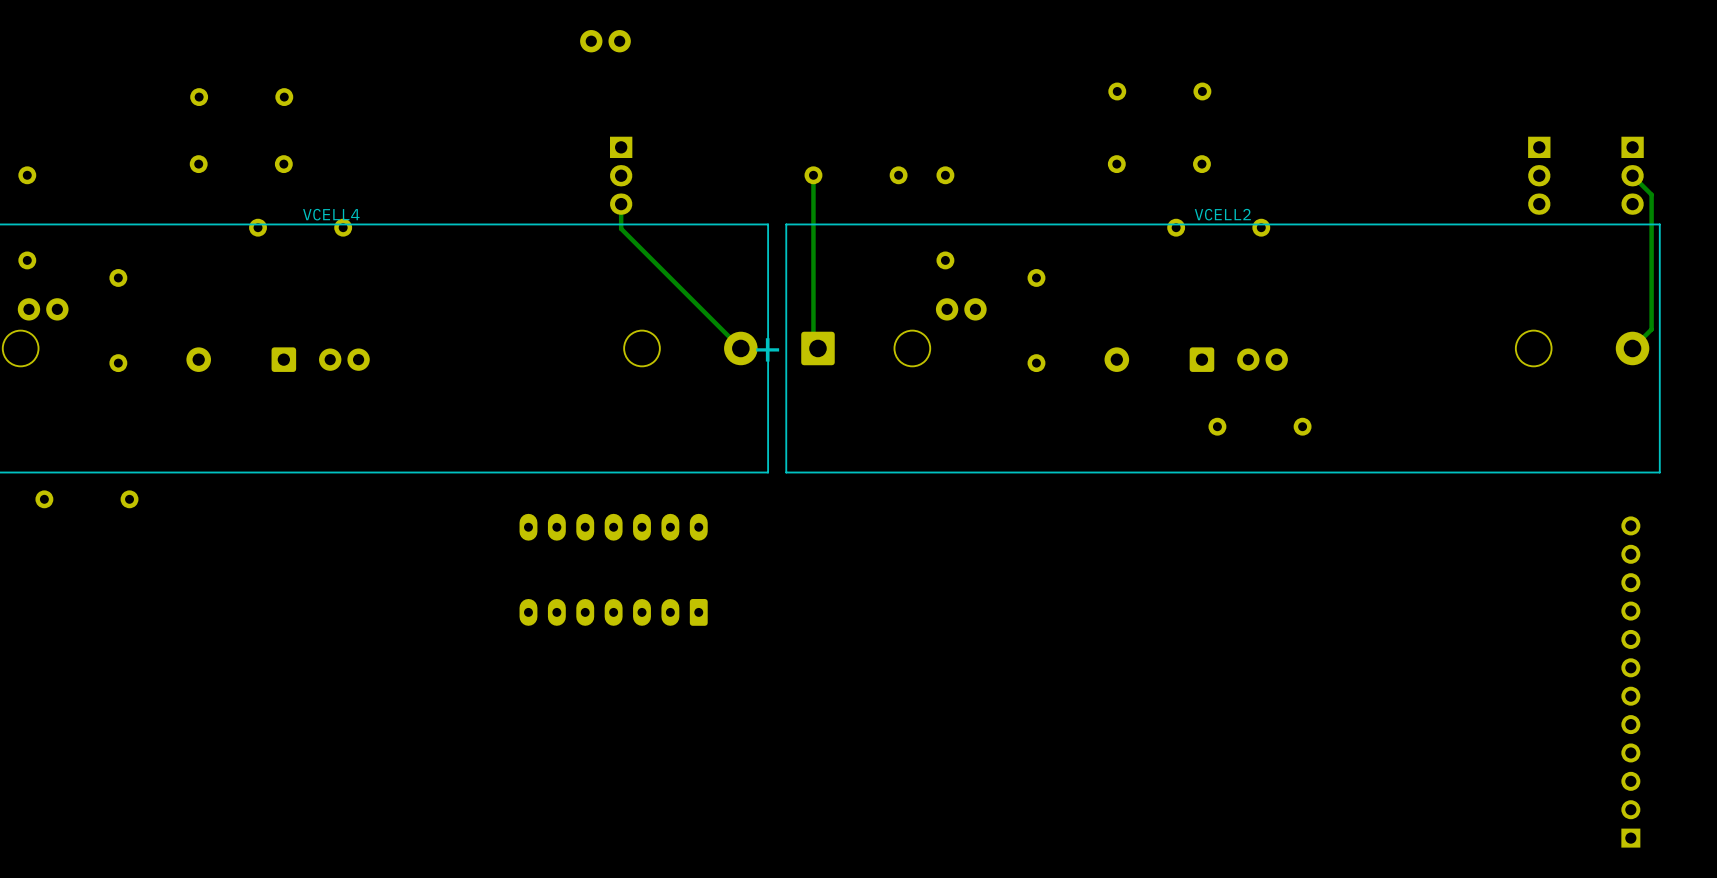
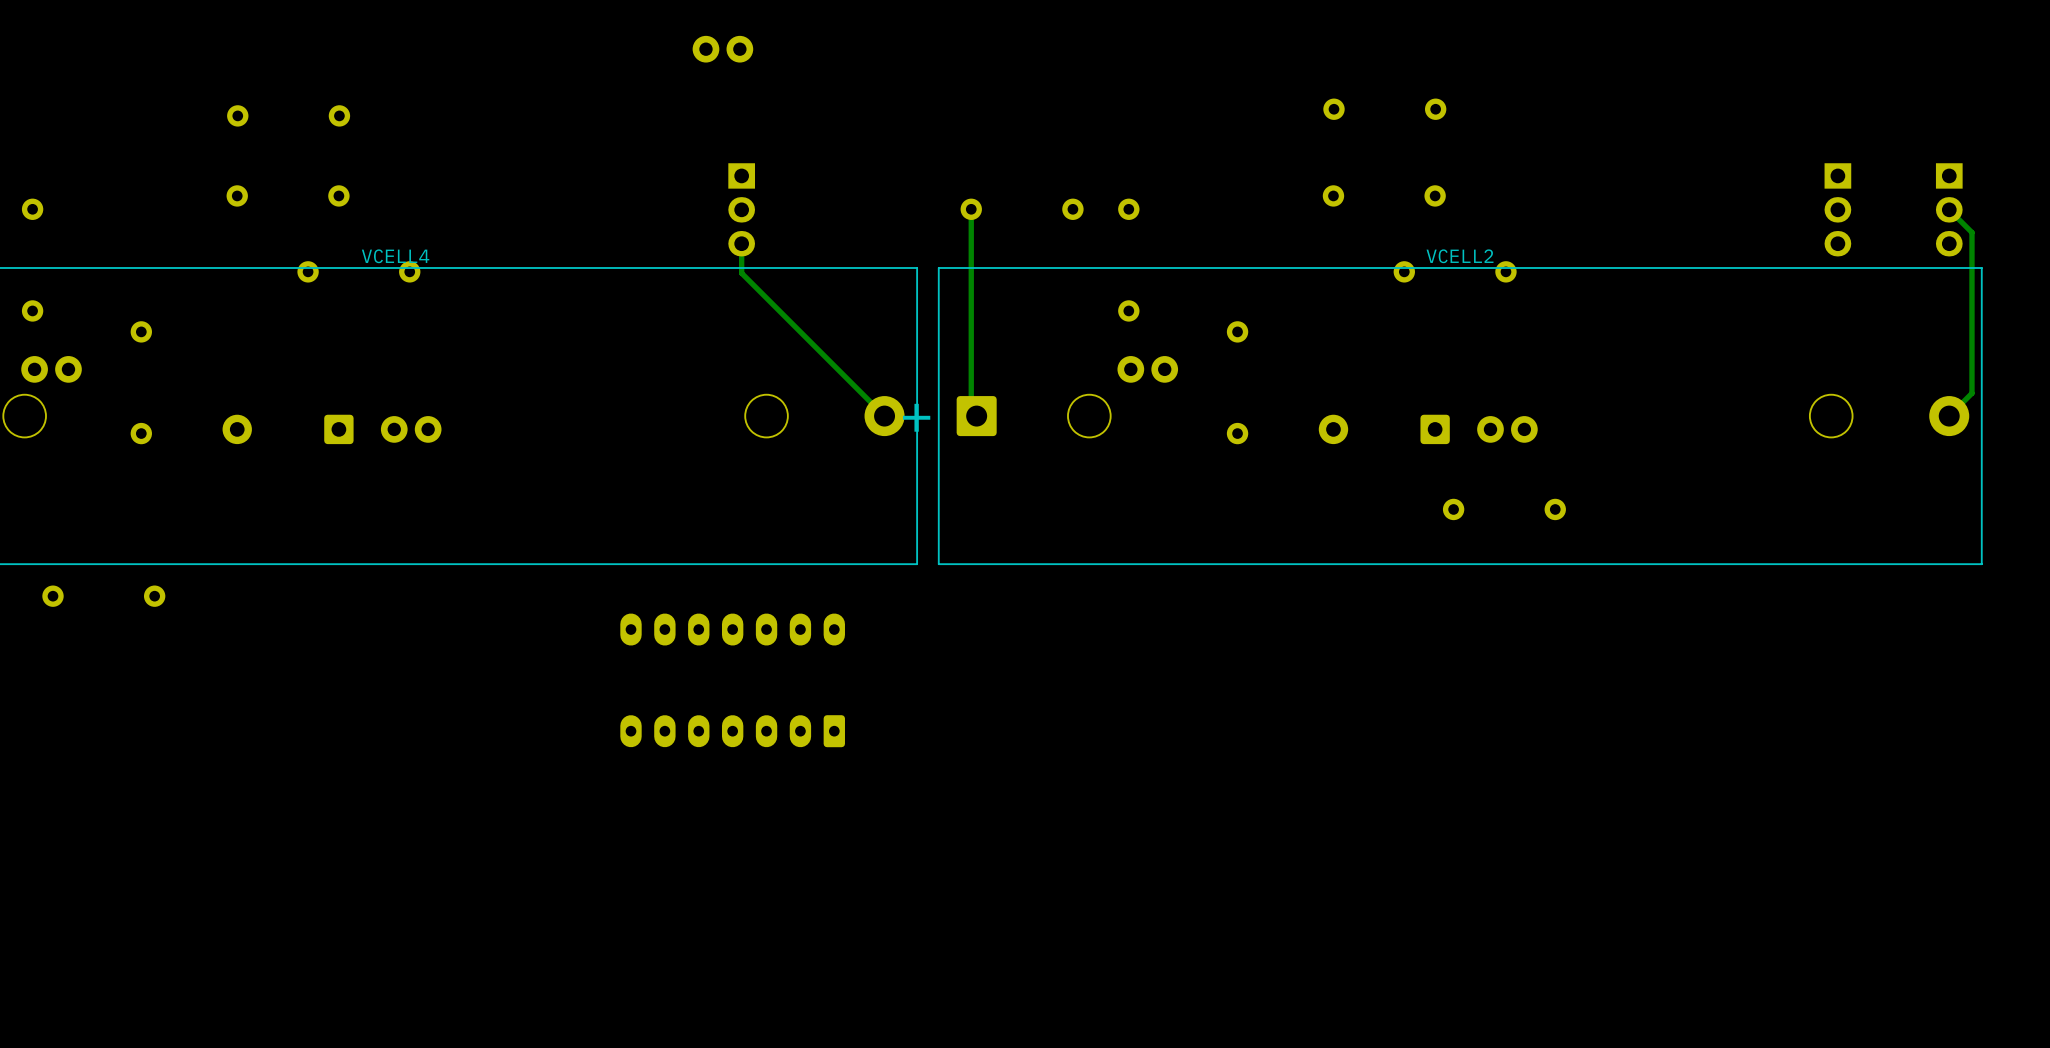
part: (1630, 682) -> none

